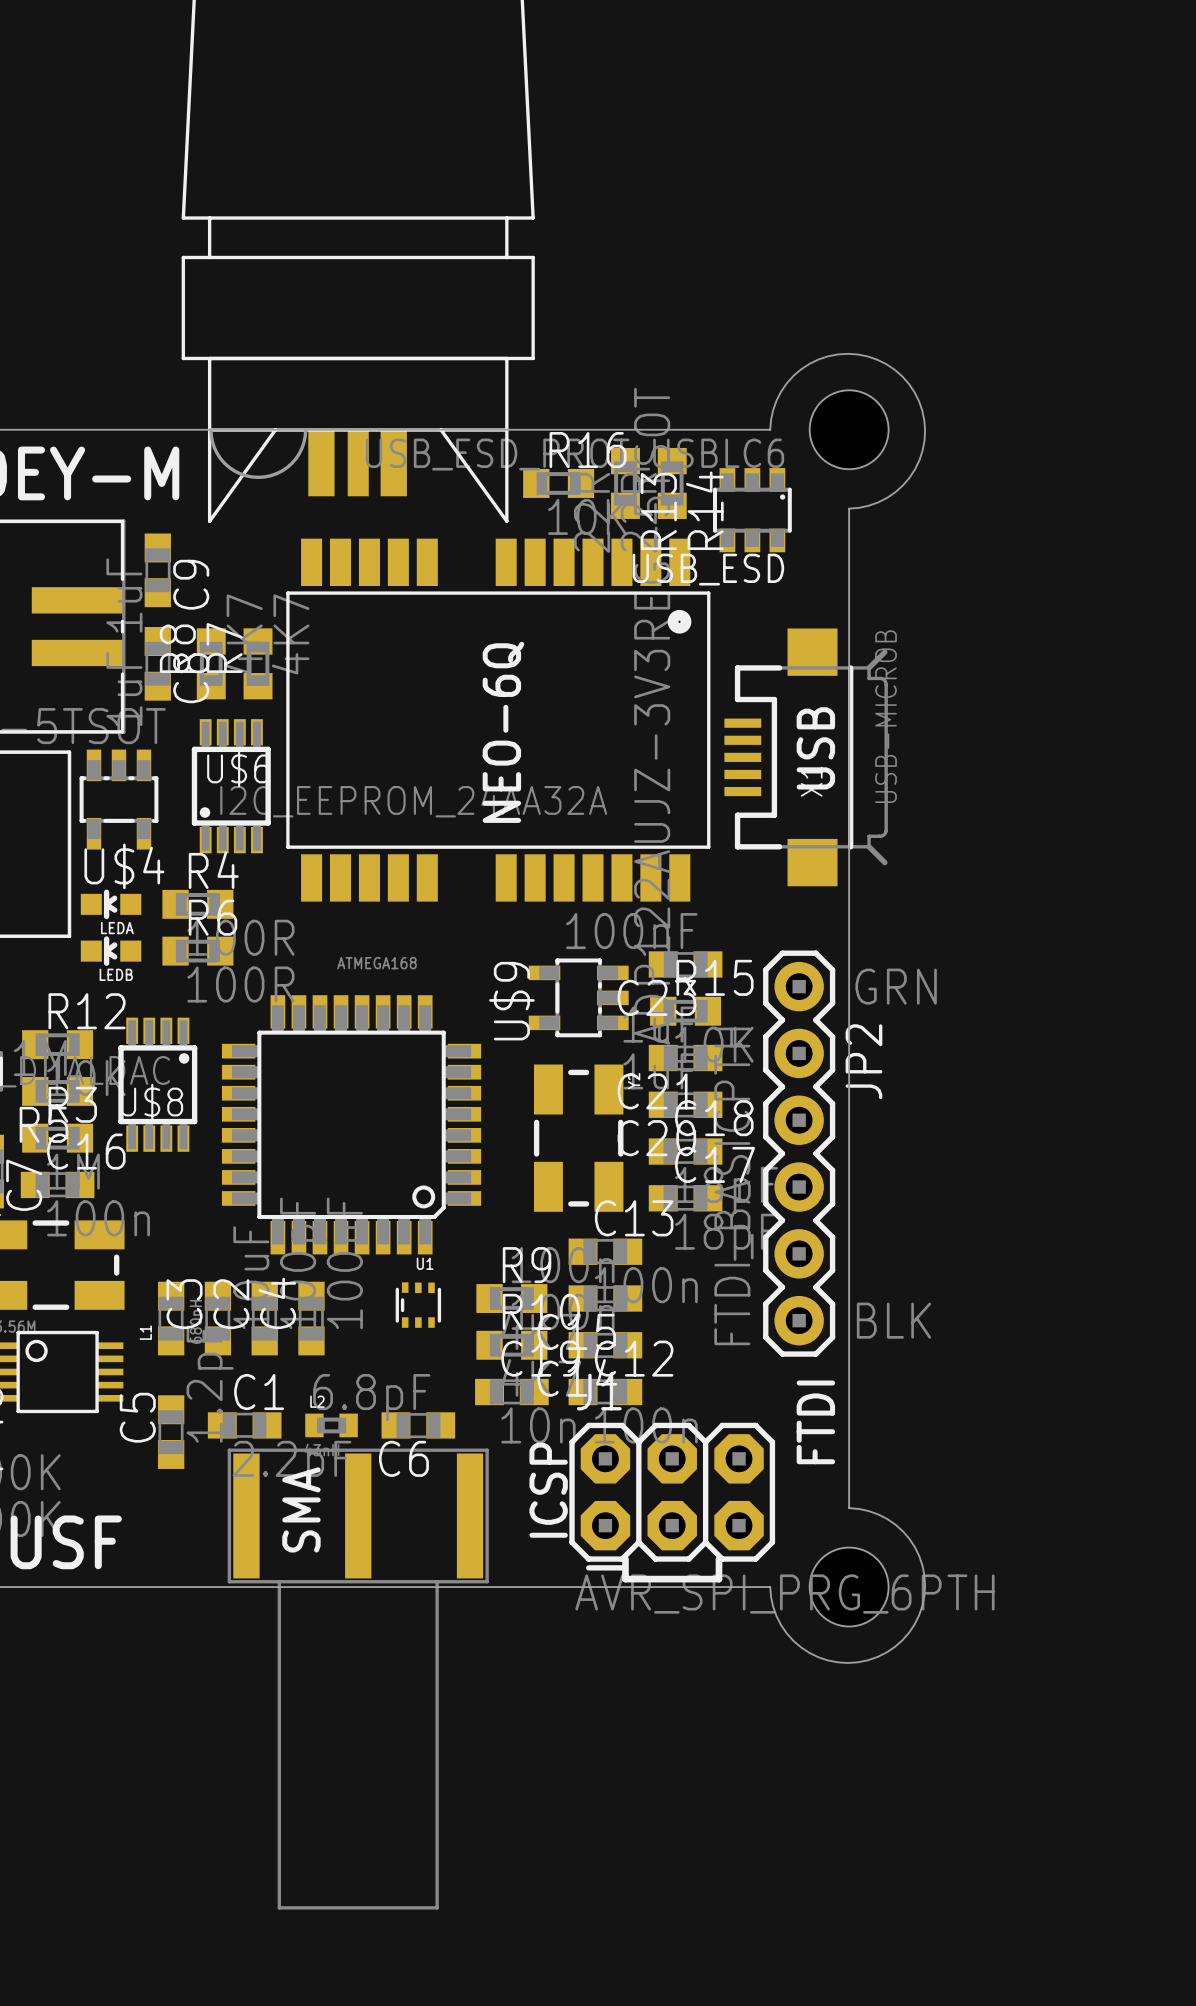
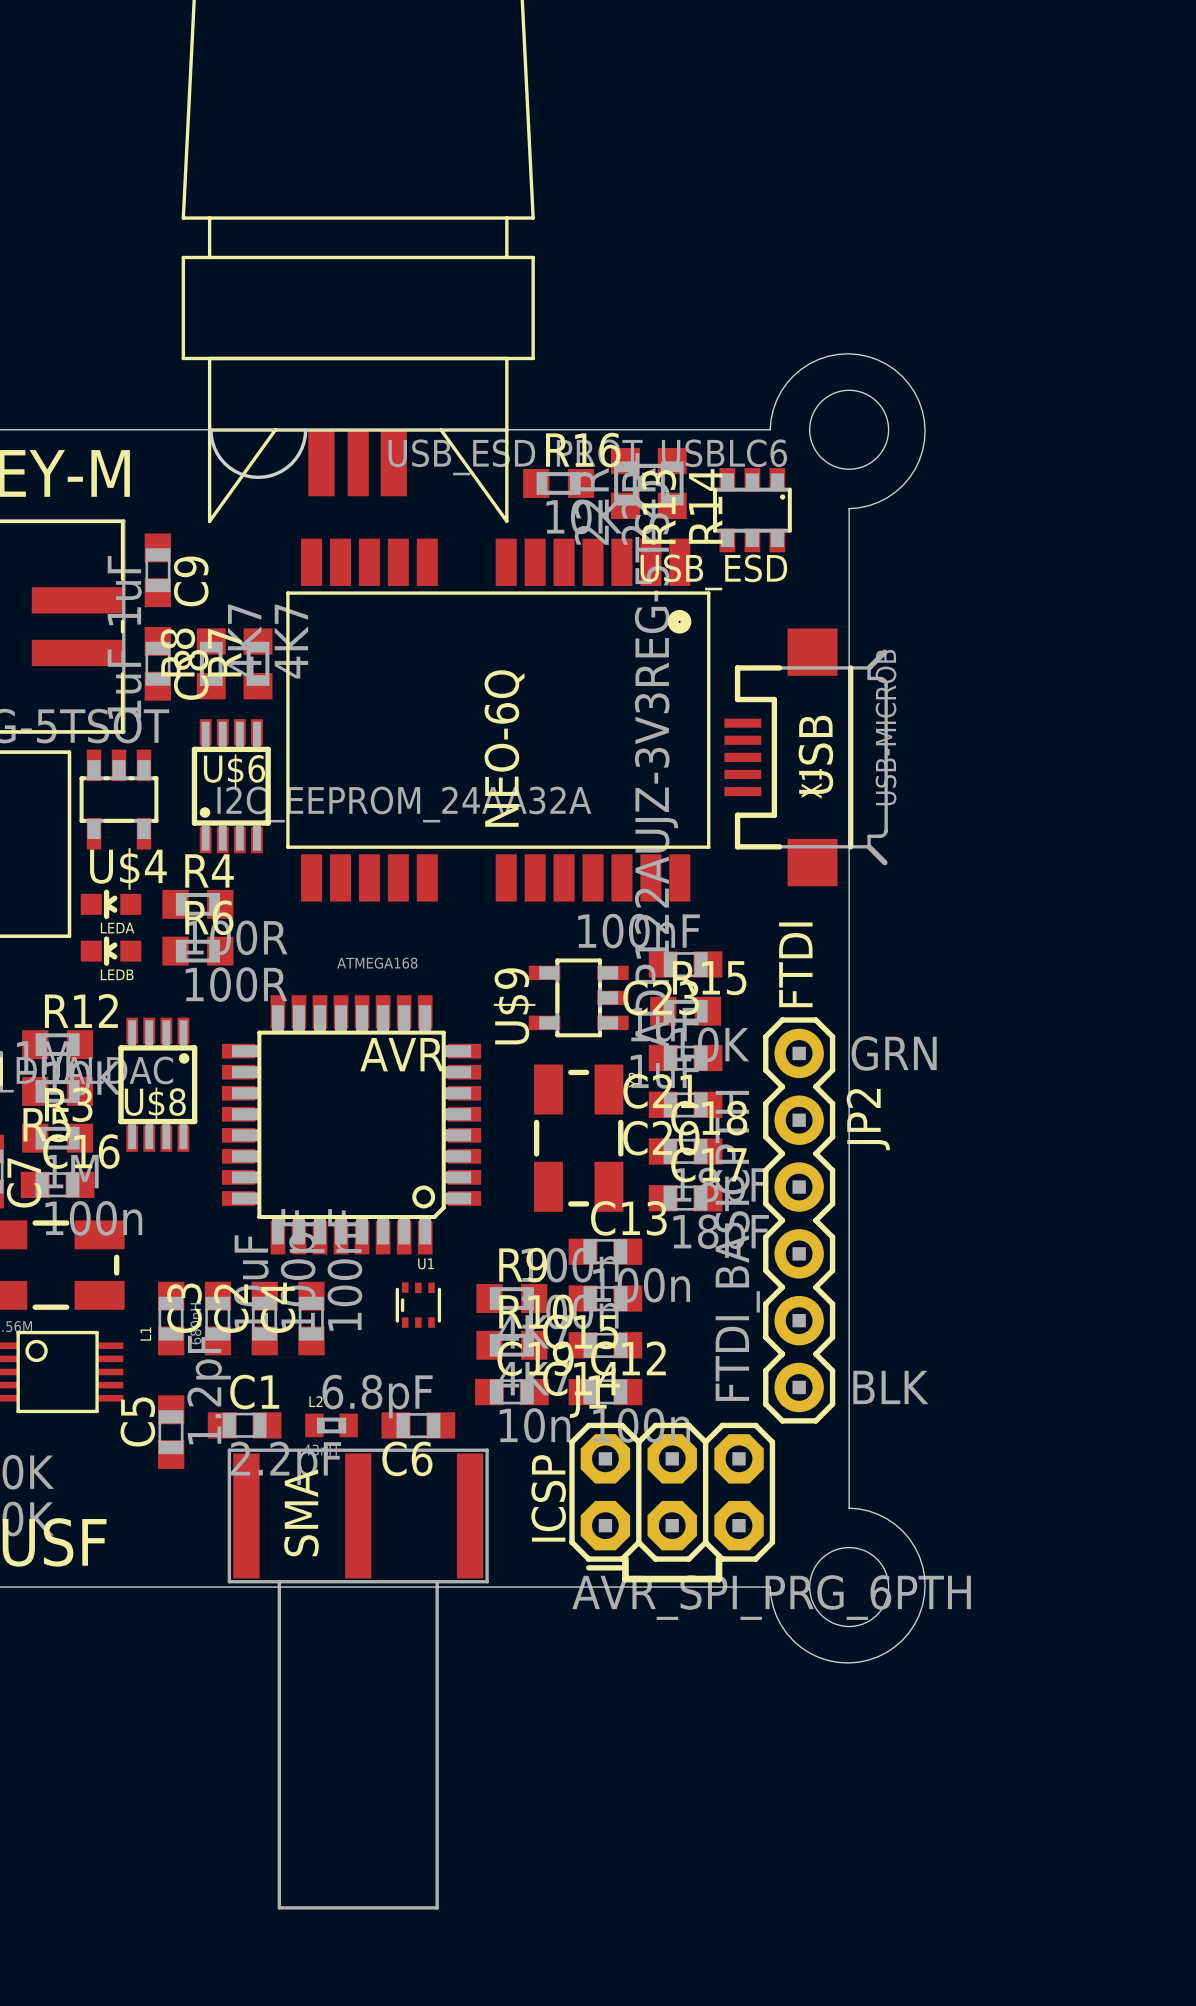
text: none -> AVR (402, 1054)
JP2 position: (799, 1153) -> (799, 1220)
text position: FTDI (815, 1422) -> FTDI (795, 964)

